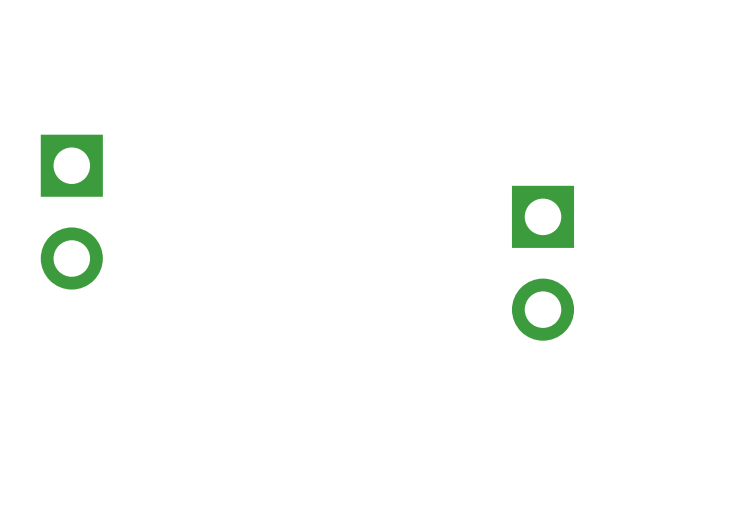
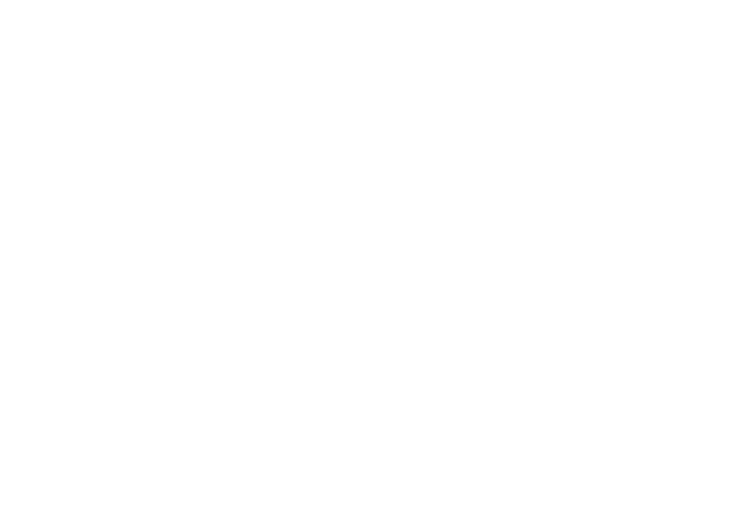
part: (71, 212) -> none
part: (543, 263) -> none

